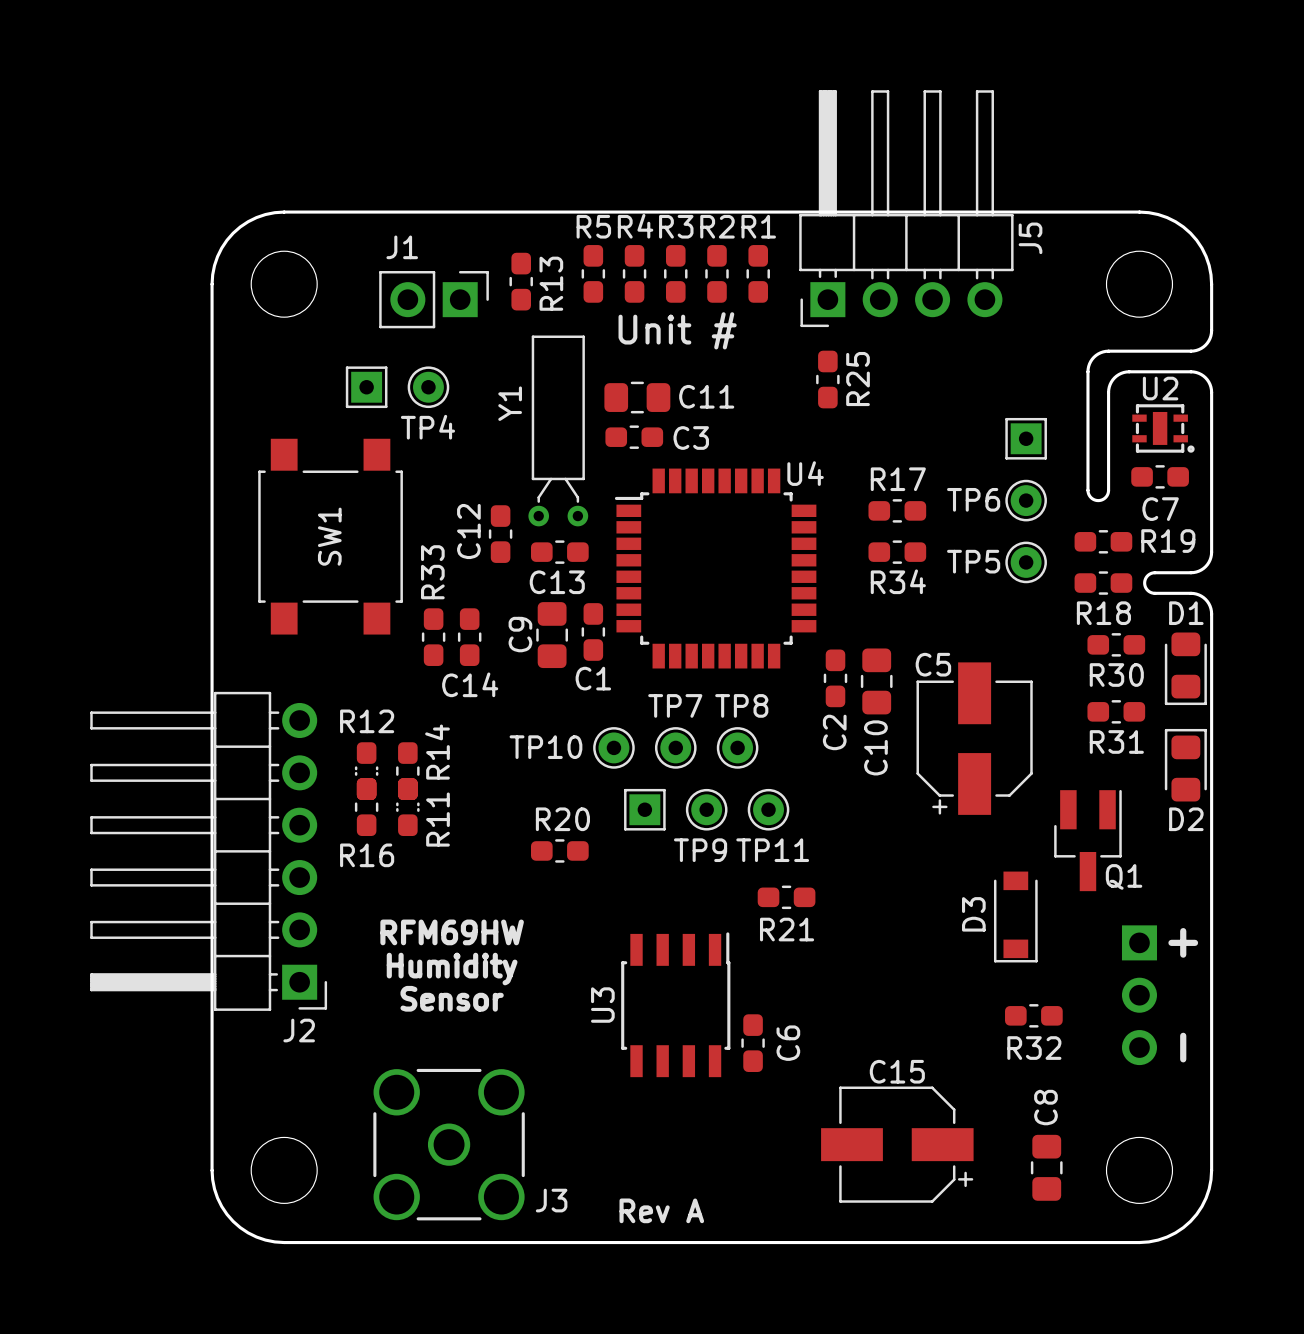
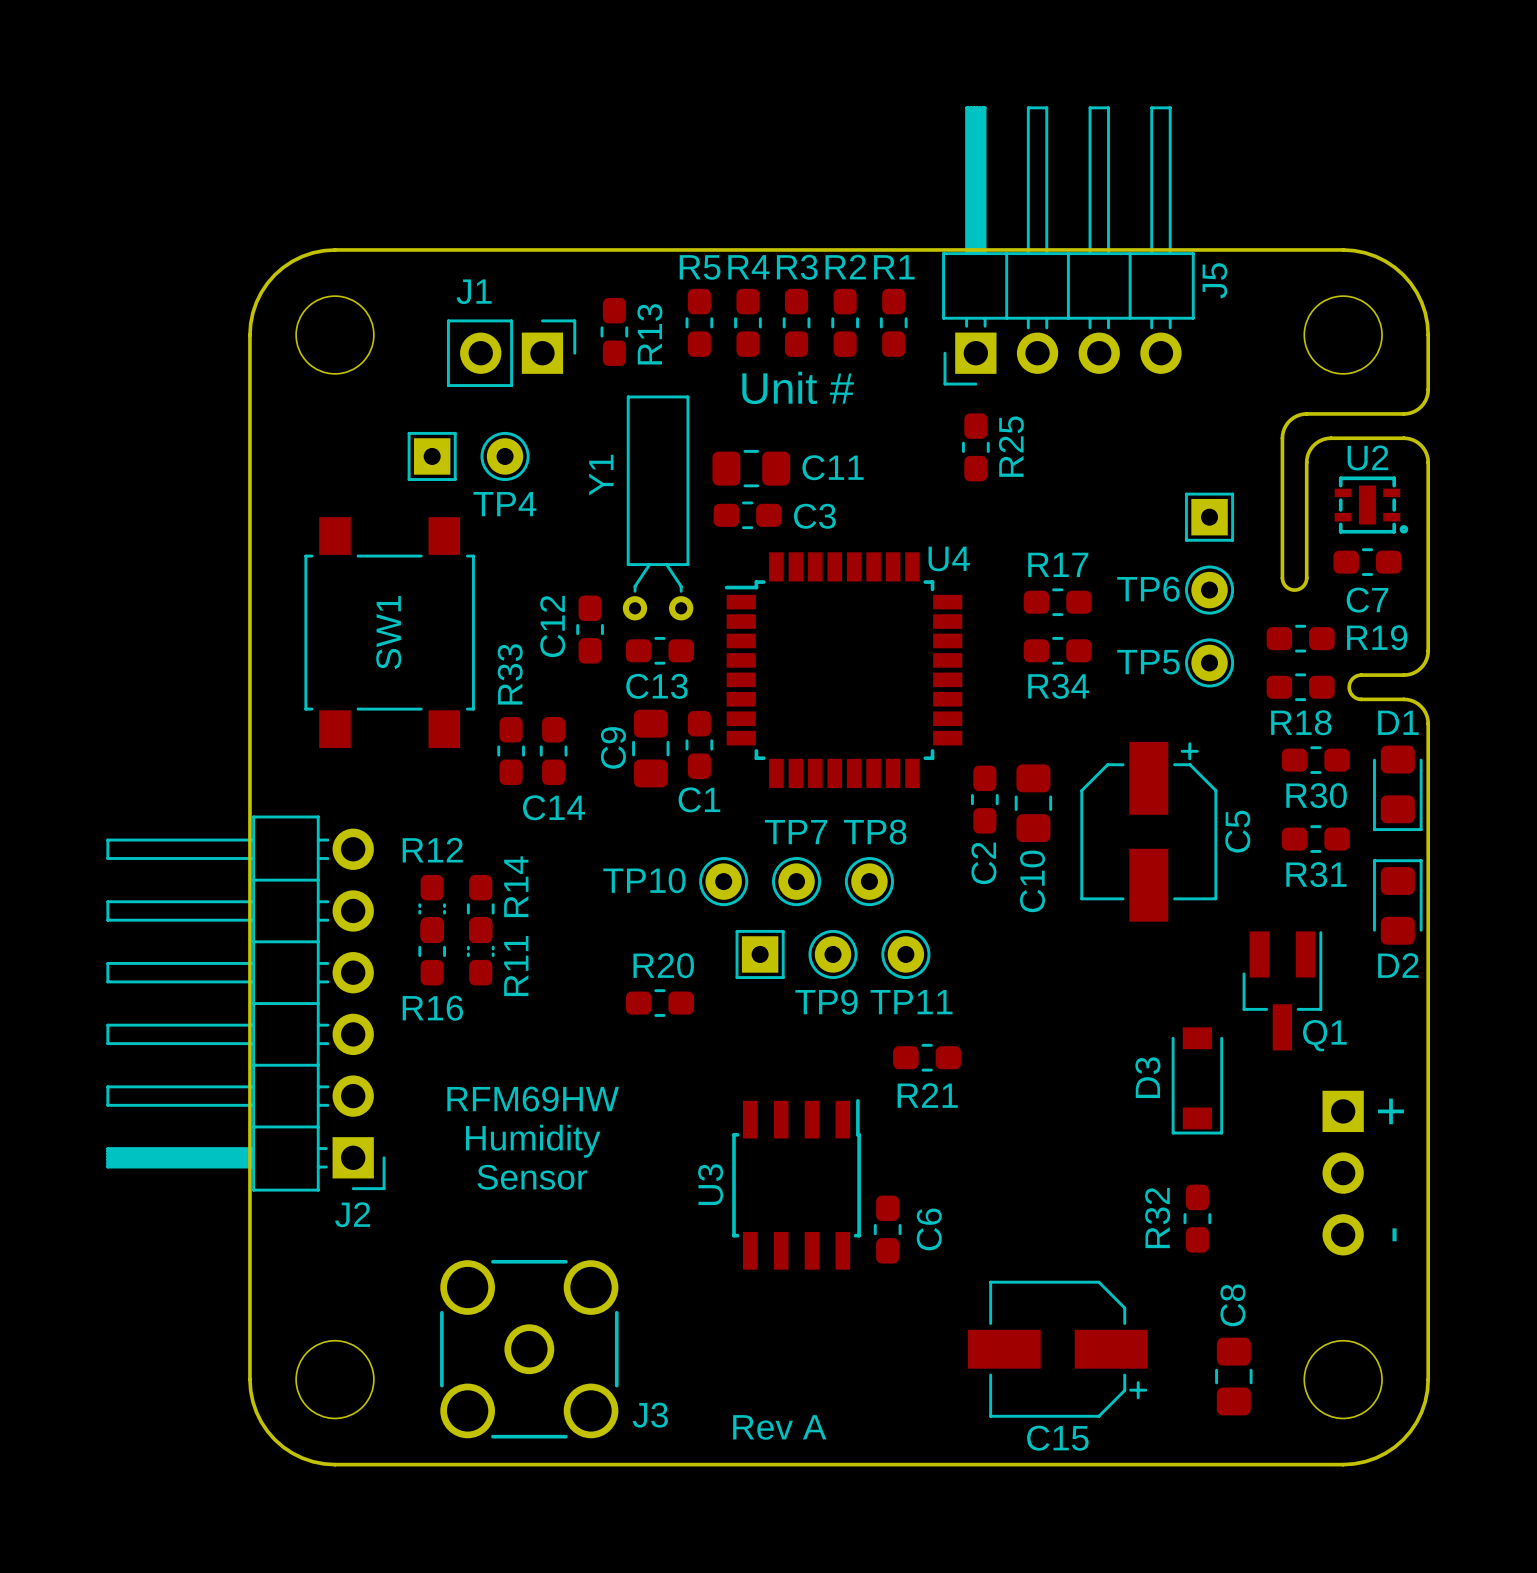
C5 name position: C5 (933, 664) -> C5 (1237, 831)
C5 rotation: 0° (974, 738) -> 180° (1148, 831)
R32 rotation: 0° (1033, 1015) -> 90° clockwise (1197, 1218)
C15 name position: C15 (897, 1071) -> C15 (1057, 1438)

